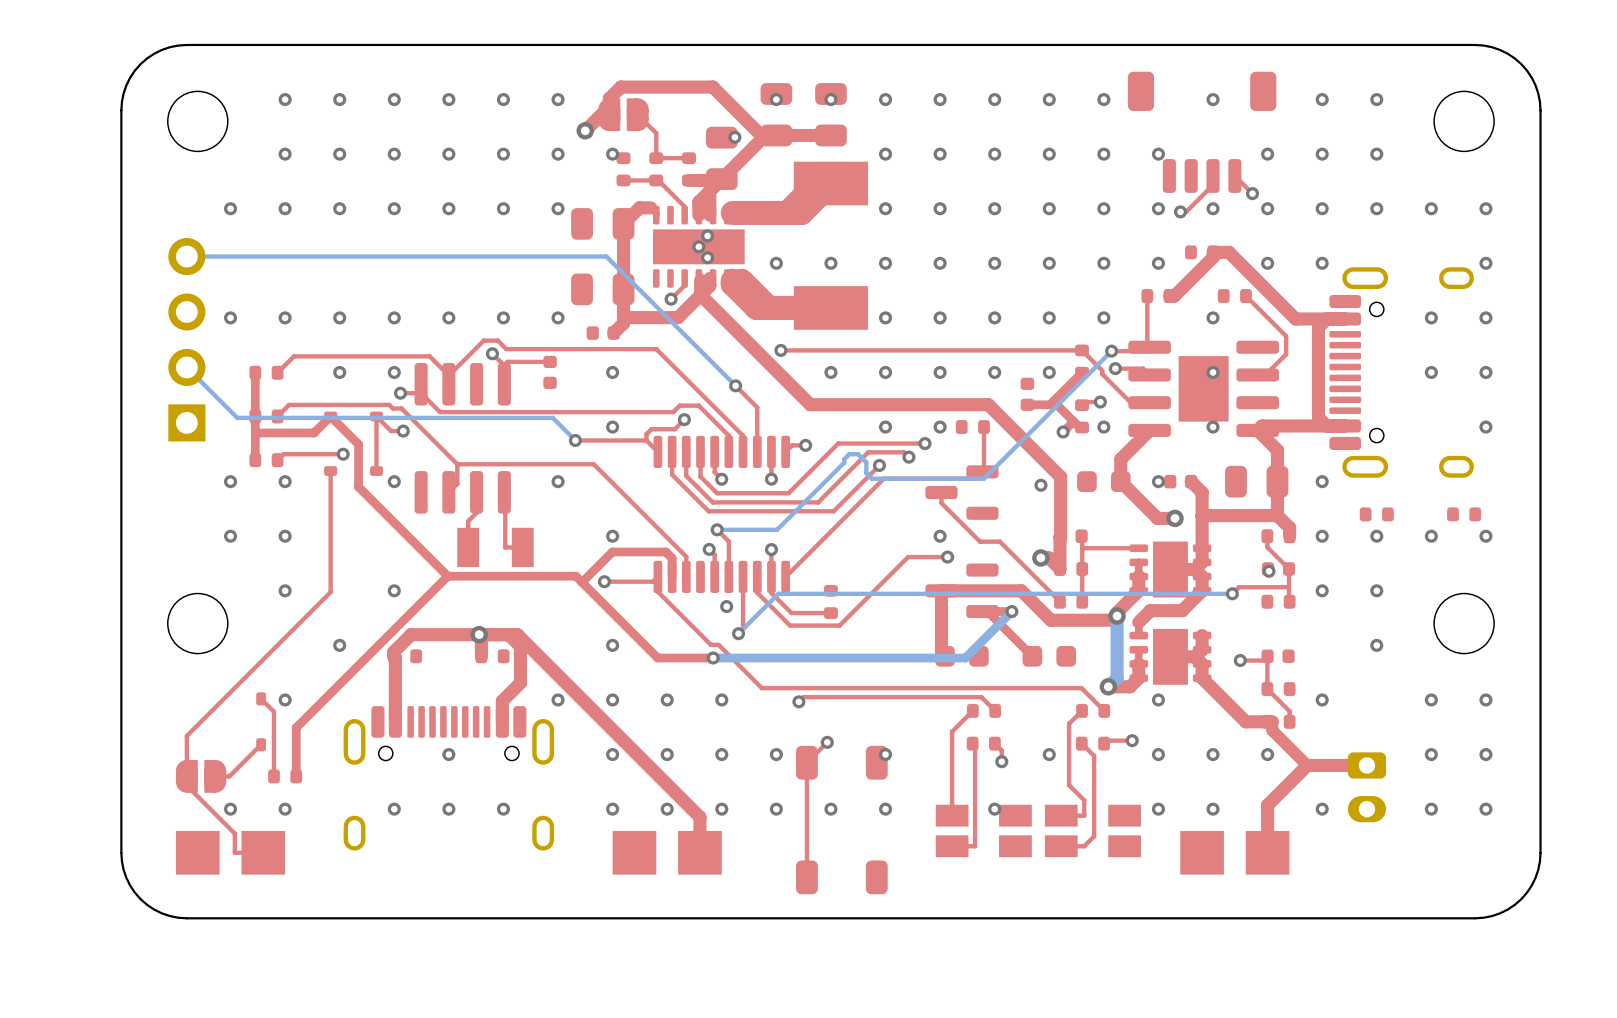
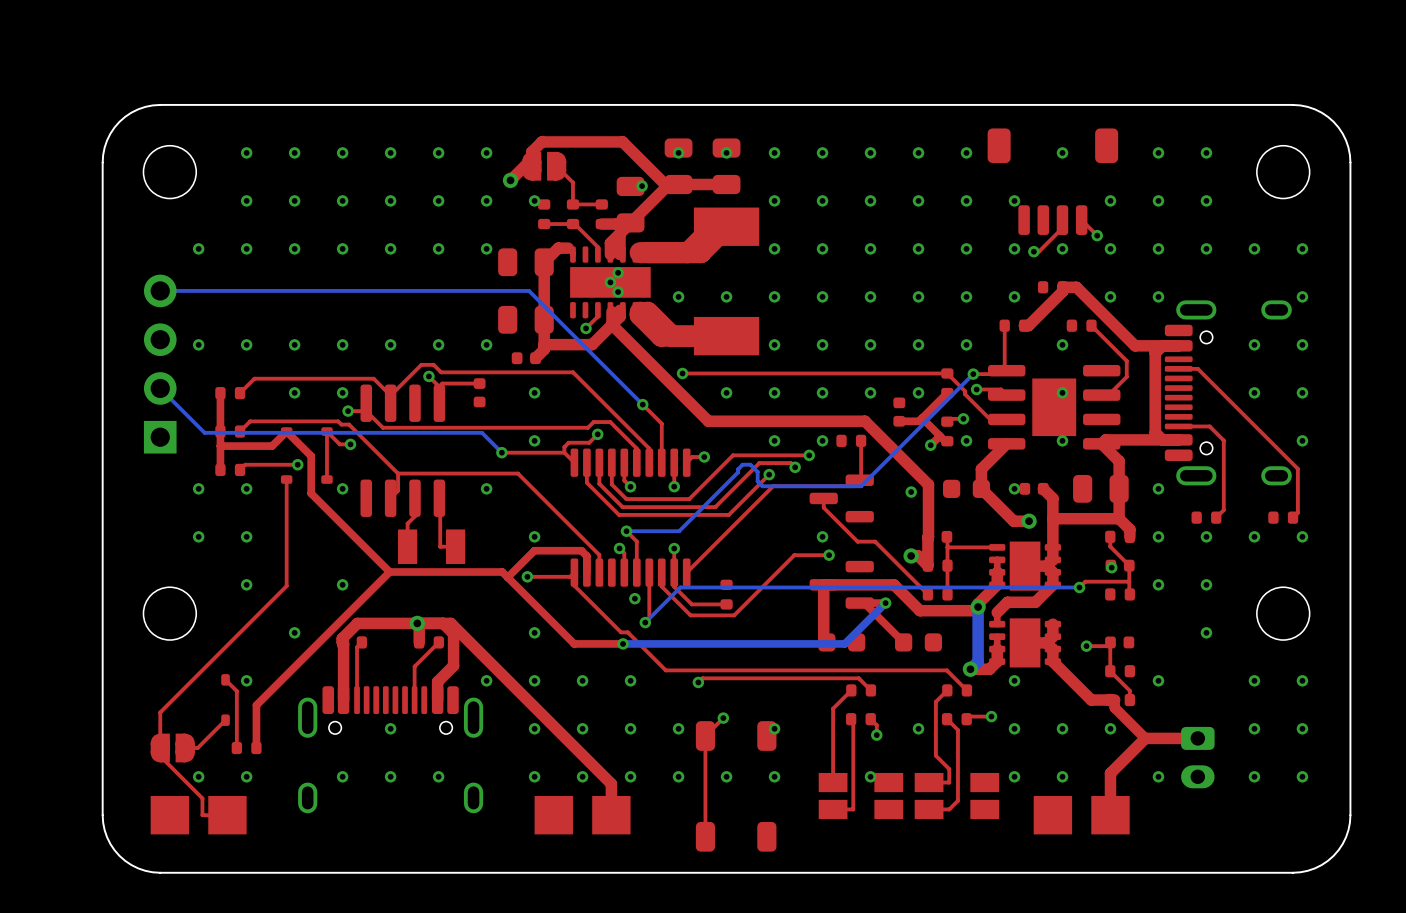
top track: none -> (1178, 368) (1197, 368) (1297, 468) (1297, 512) (1293, 517)
top track: none -> (1178, 426) (1209, 426) (1223, 440) (1223, 510) (1216, 517)
top track: none -> (361, 642) (357, 647) (357, 700)
top track: none -> (438, 642) (414, 666) (414, 700)

